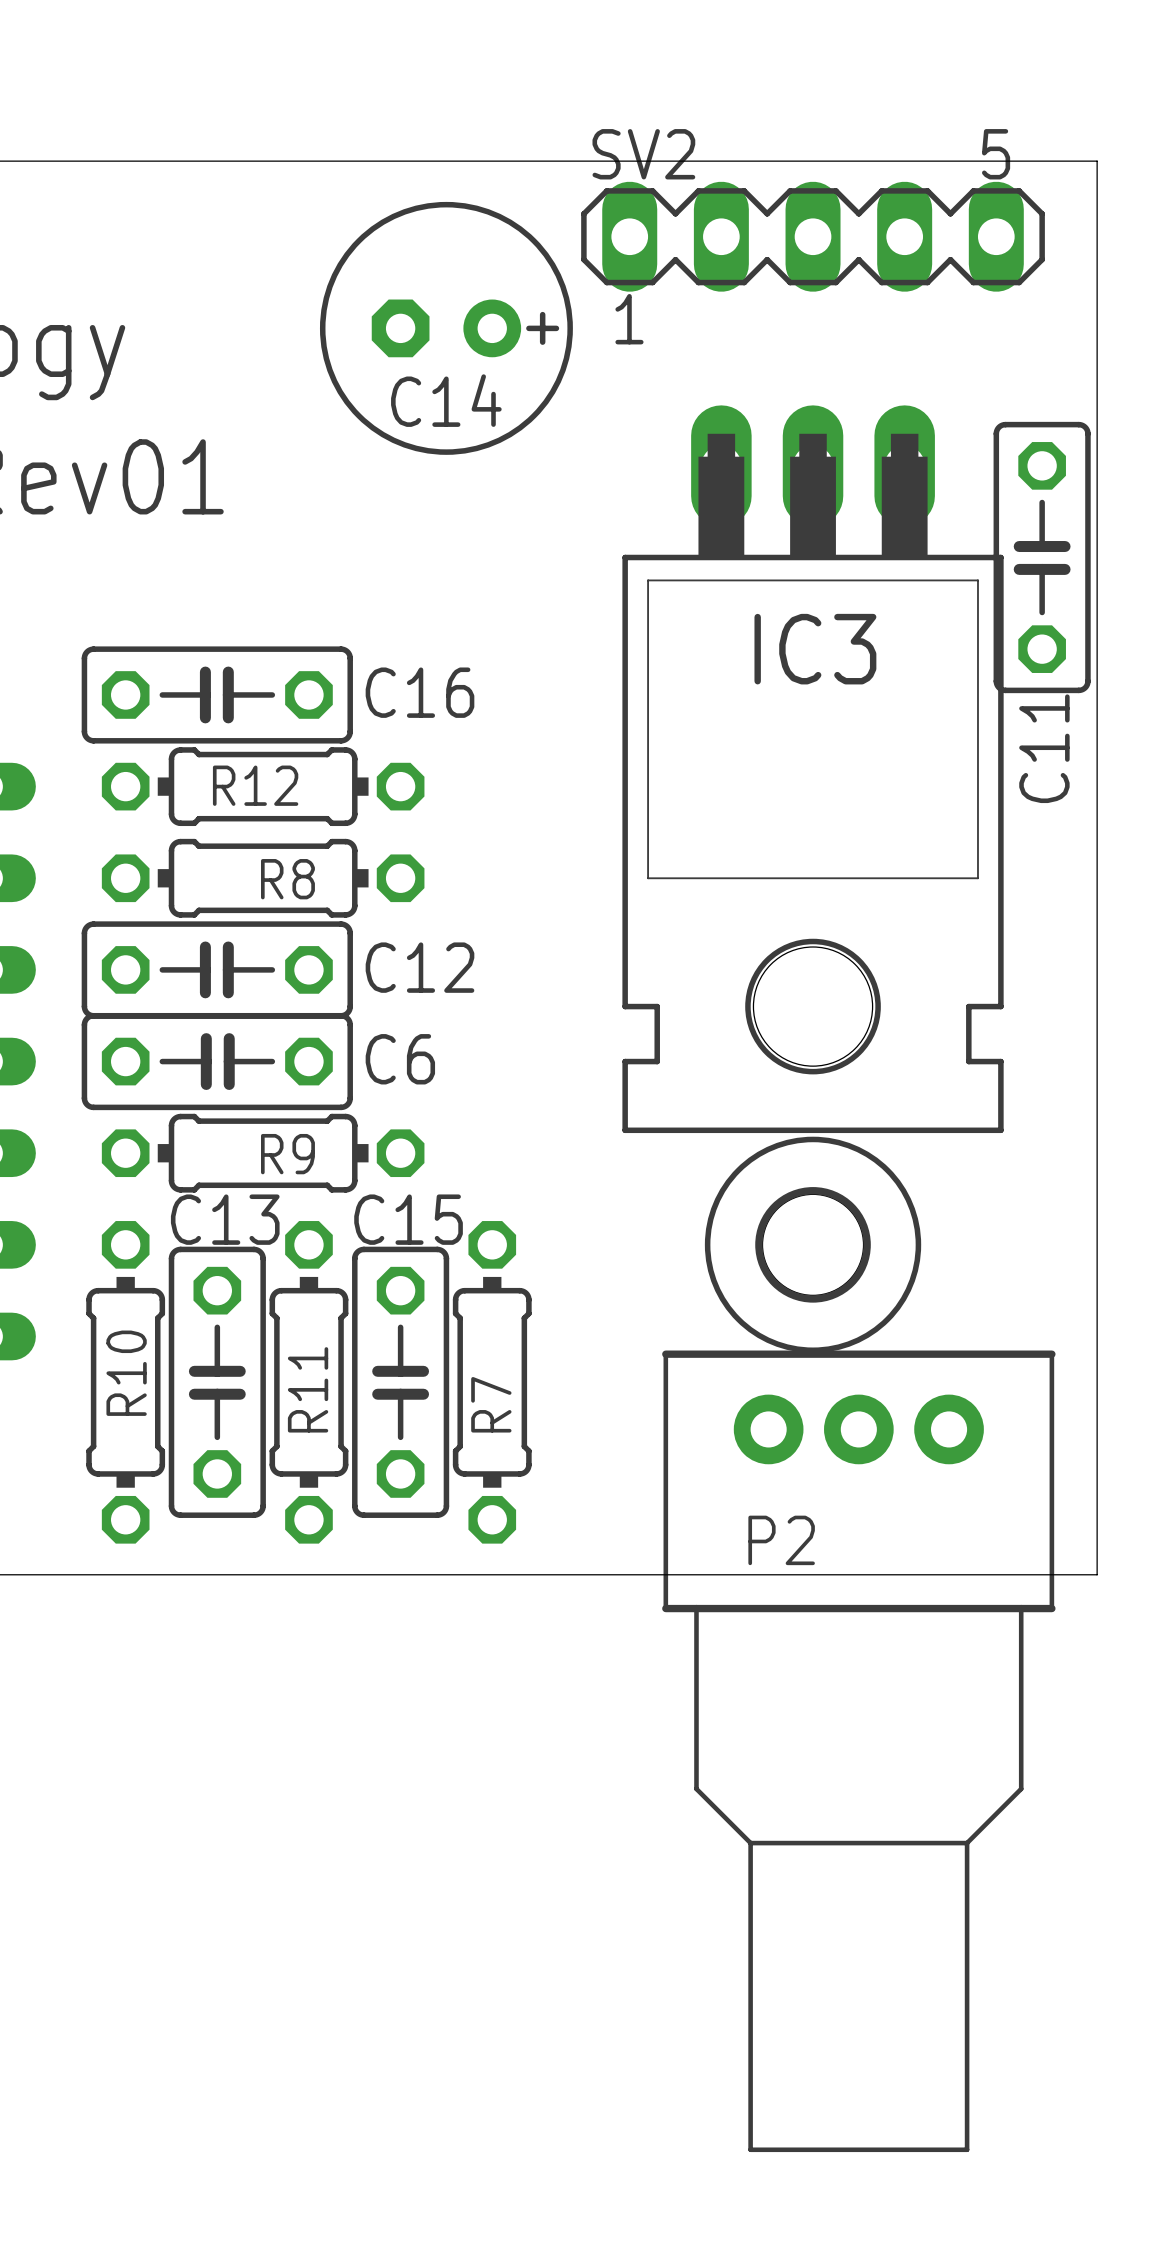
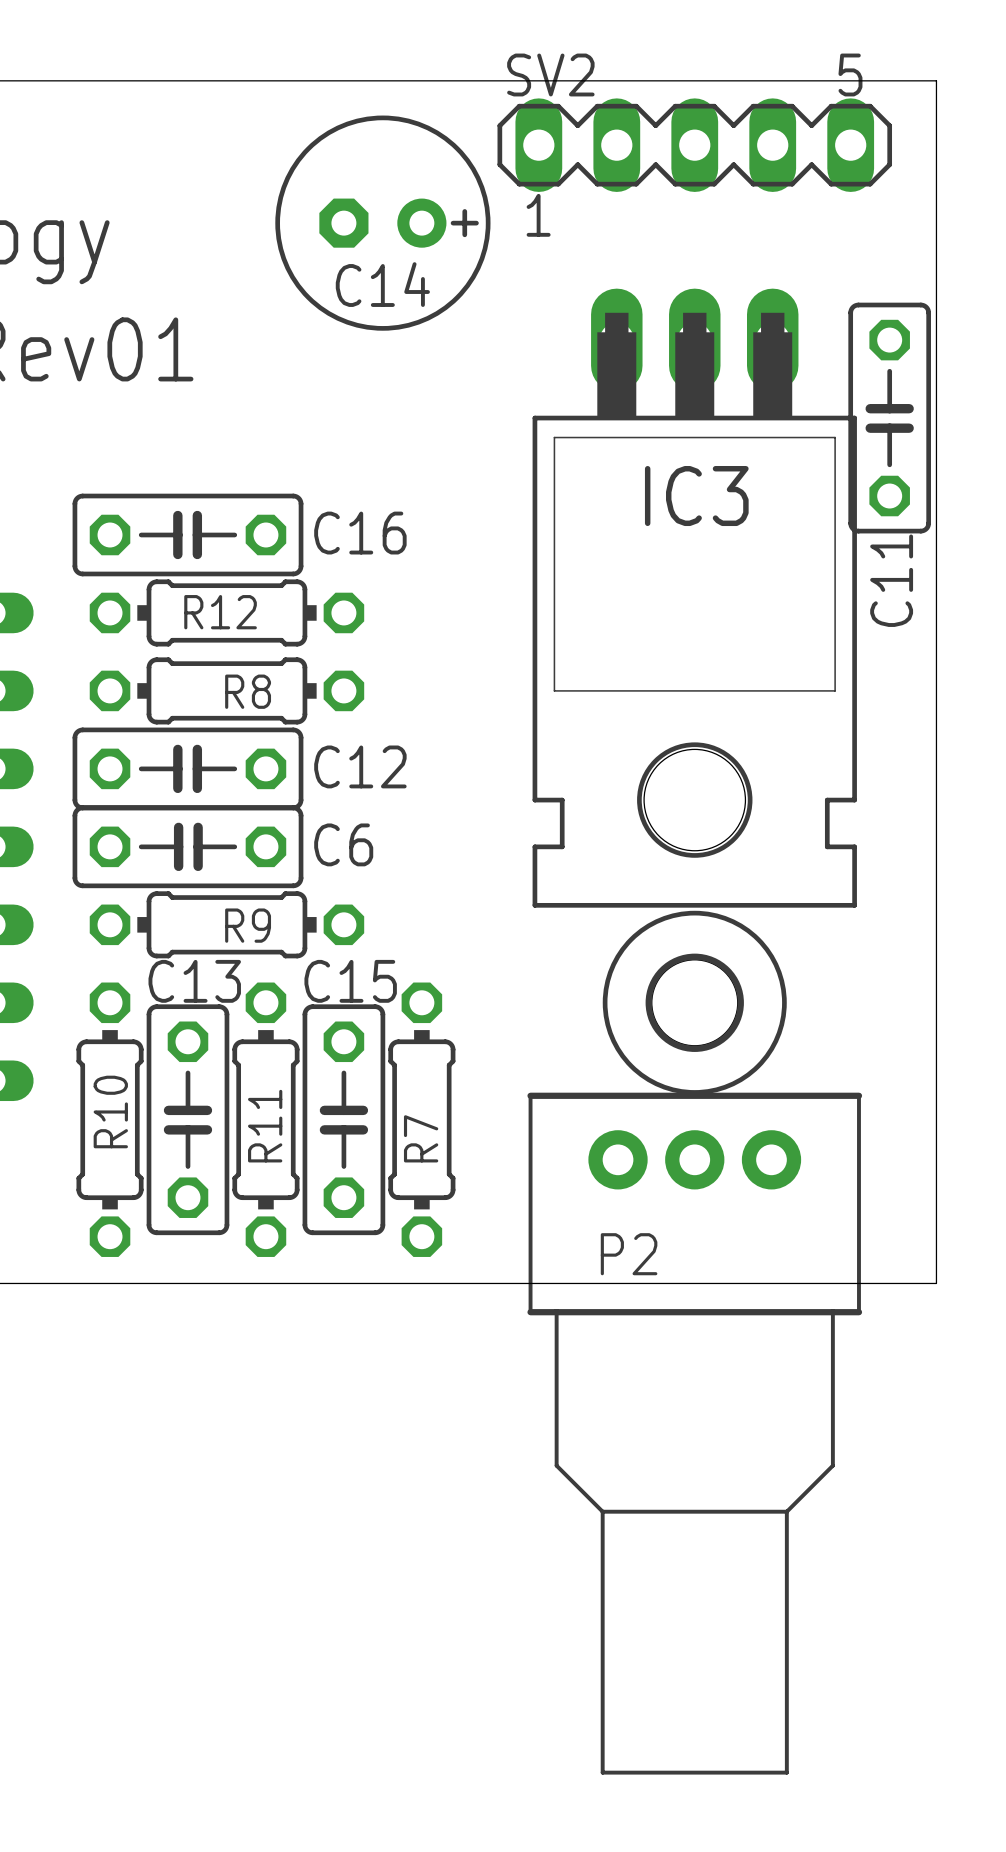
P2 position: (858, 1751) -> (694, 1433)

